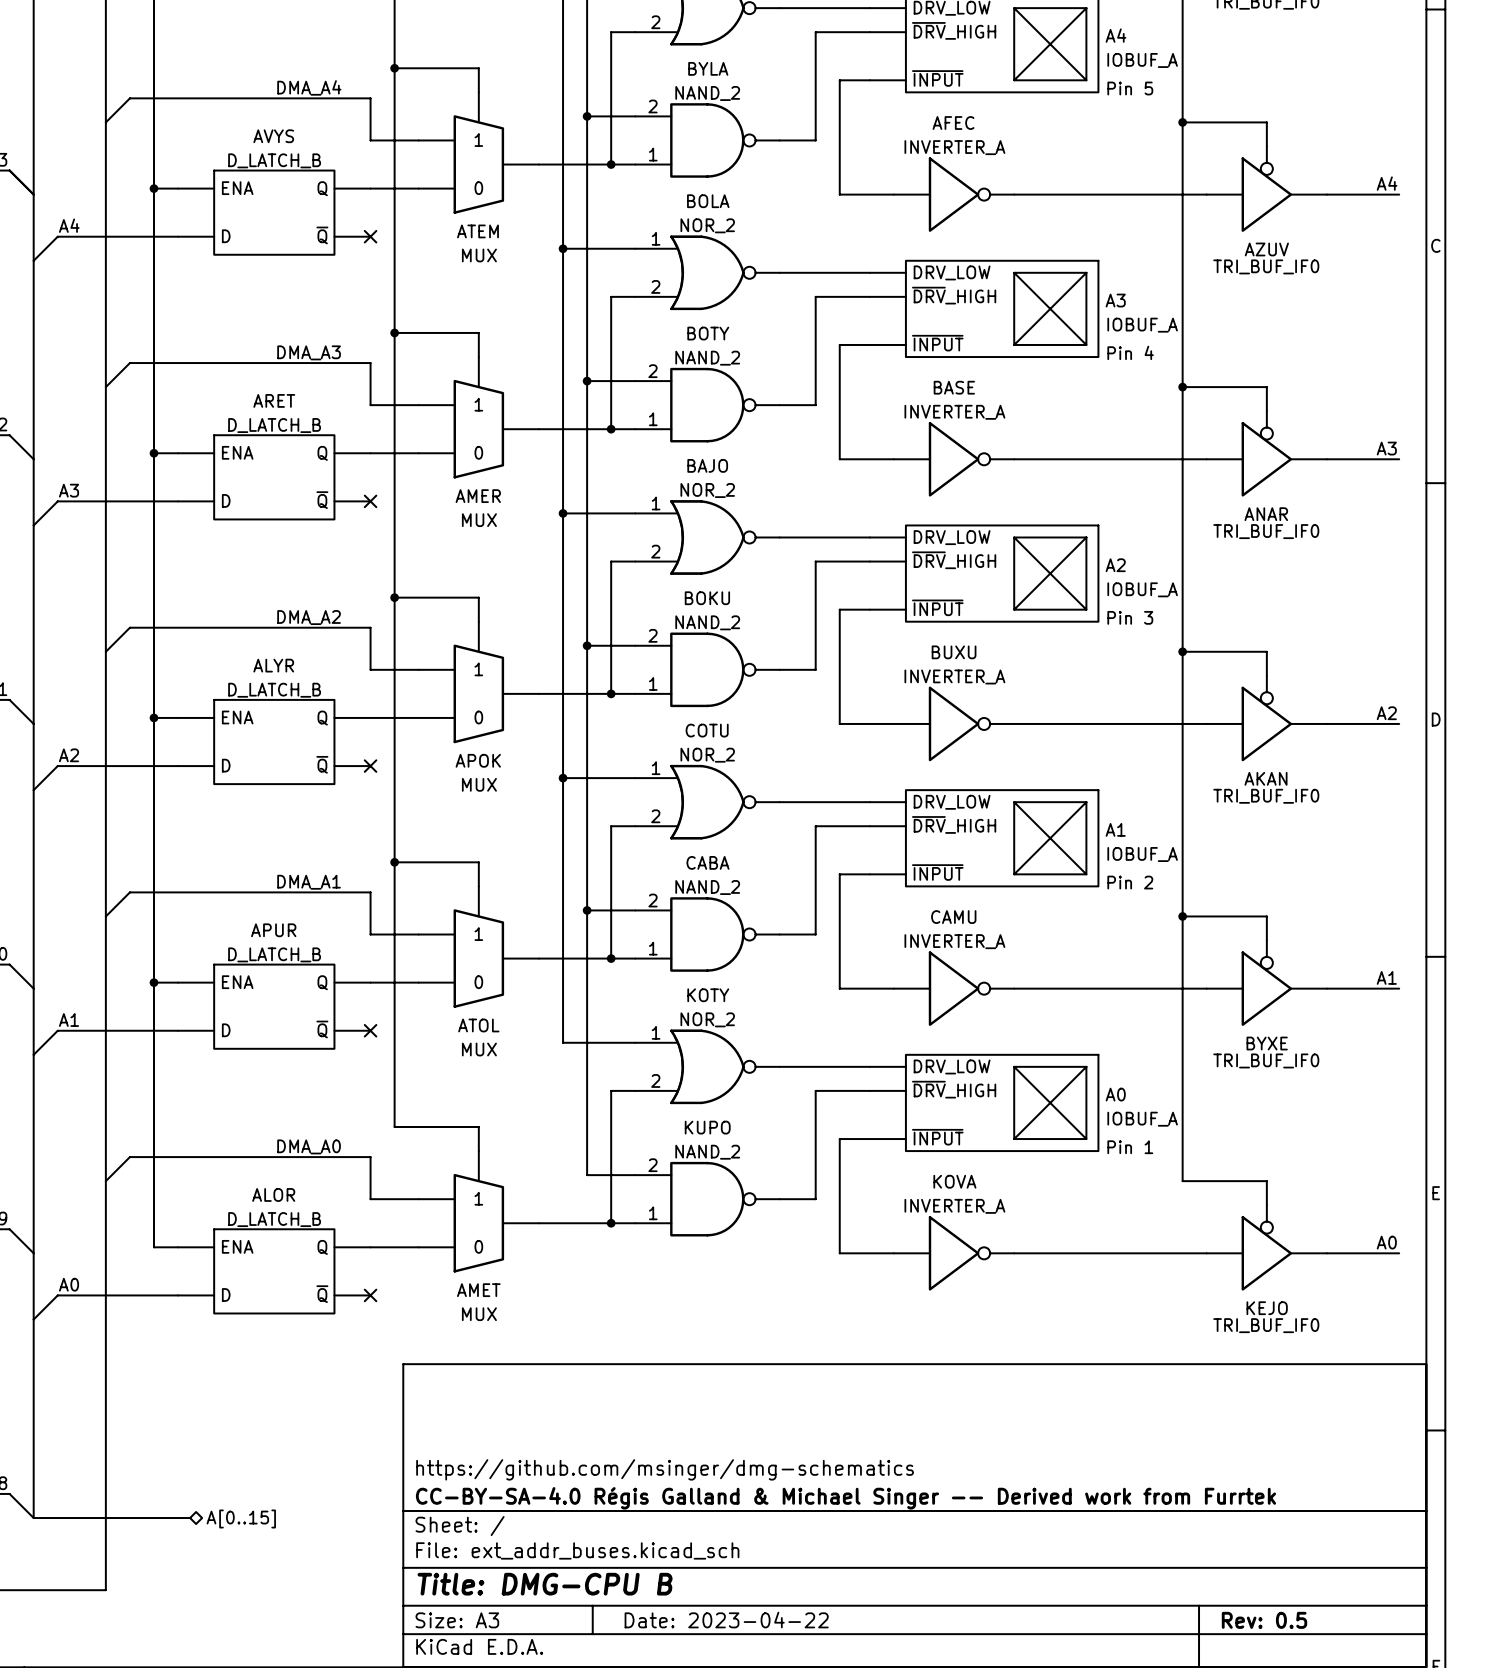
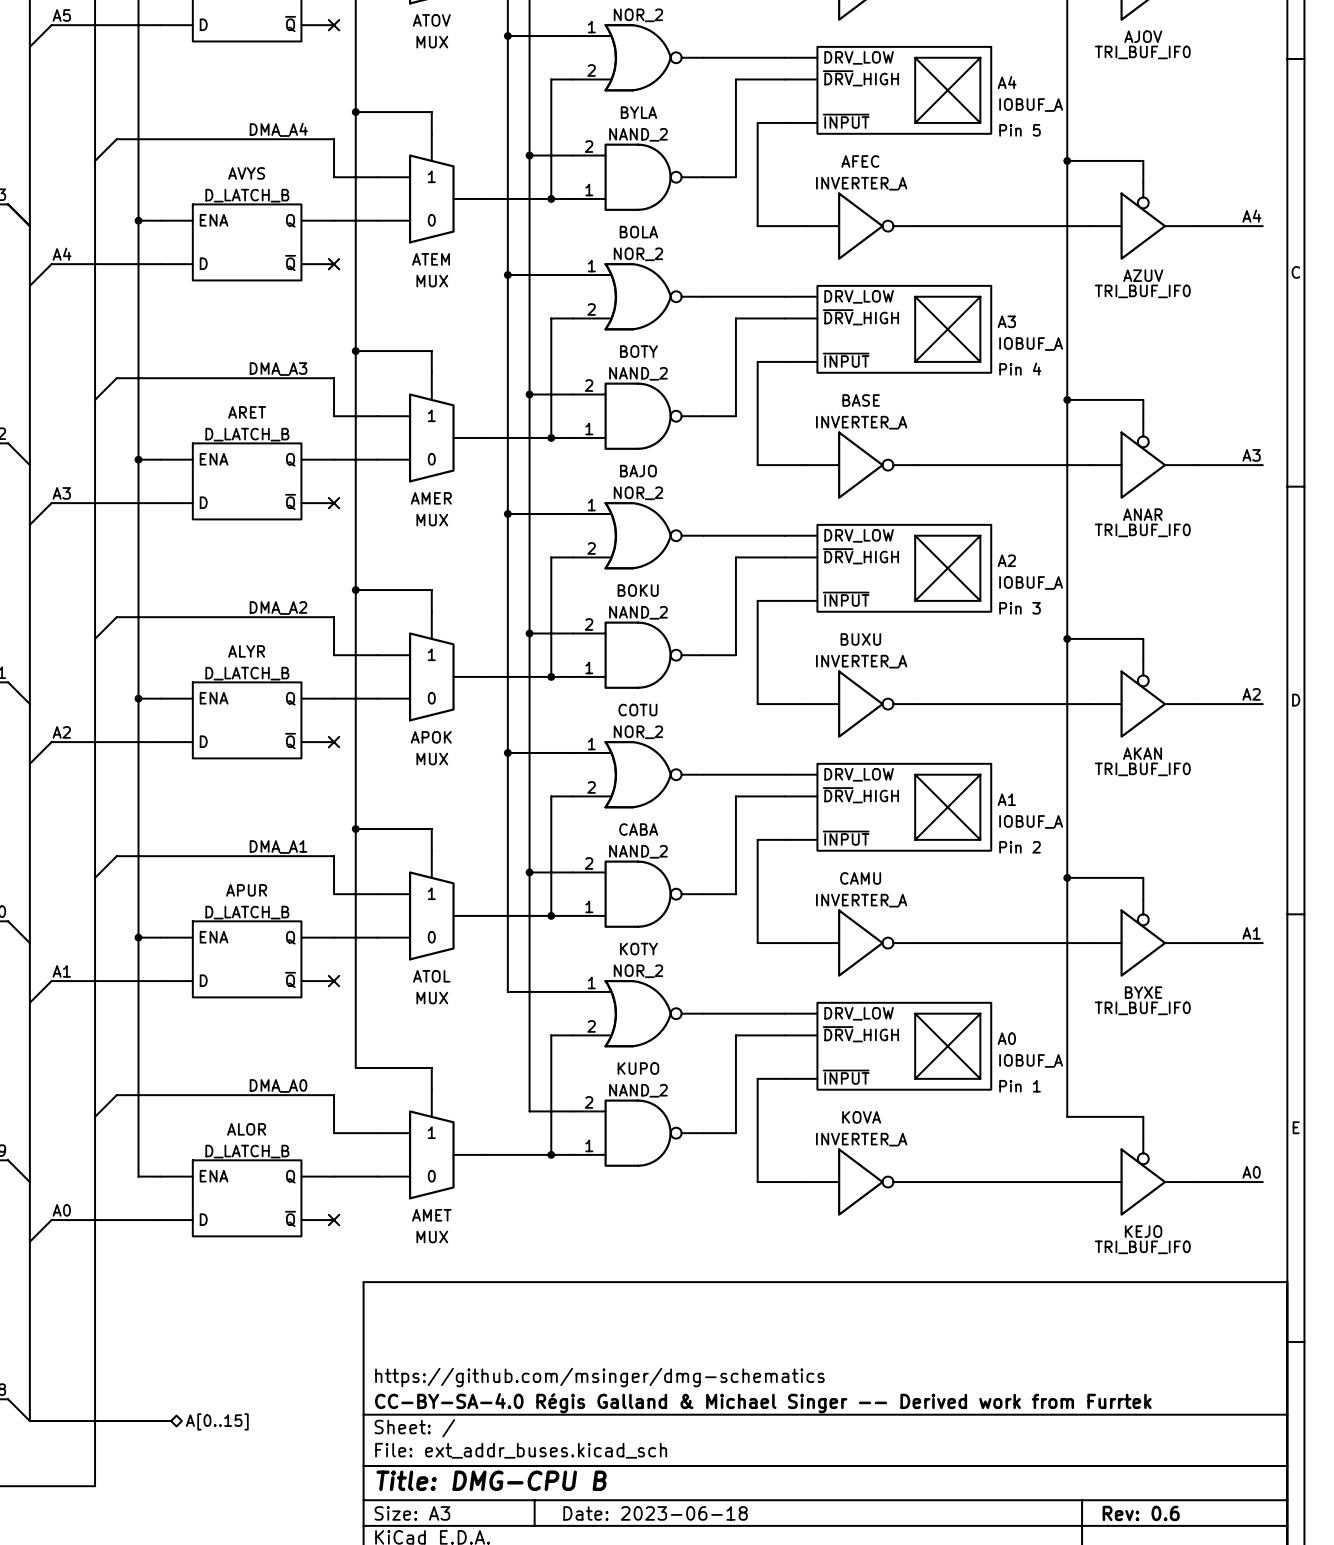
title block: Date: 2023-04-22 (726, 1620) -> Date: 2023-06-18 (655, 1513)
title block: Rev: 0.5 (1264, 1620) -> Rev: 0.6 (1141, 1513)

